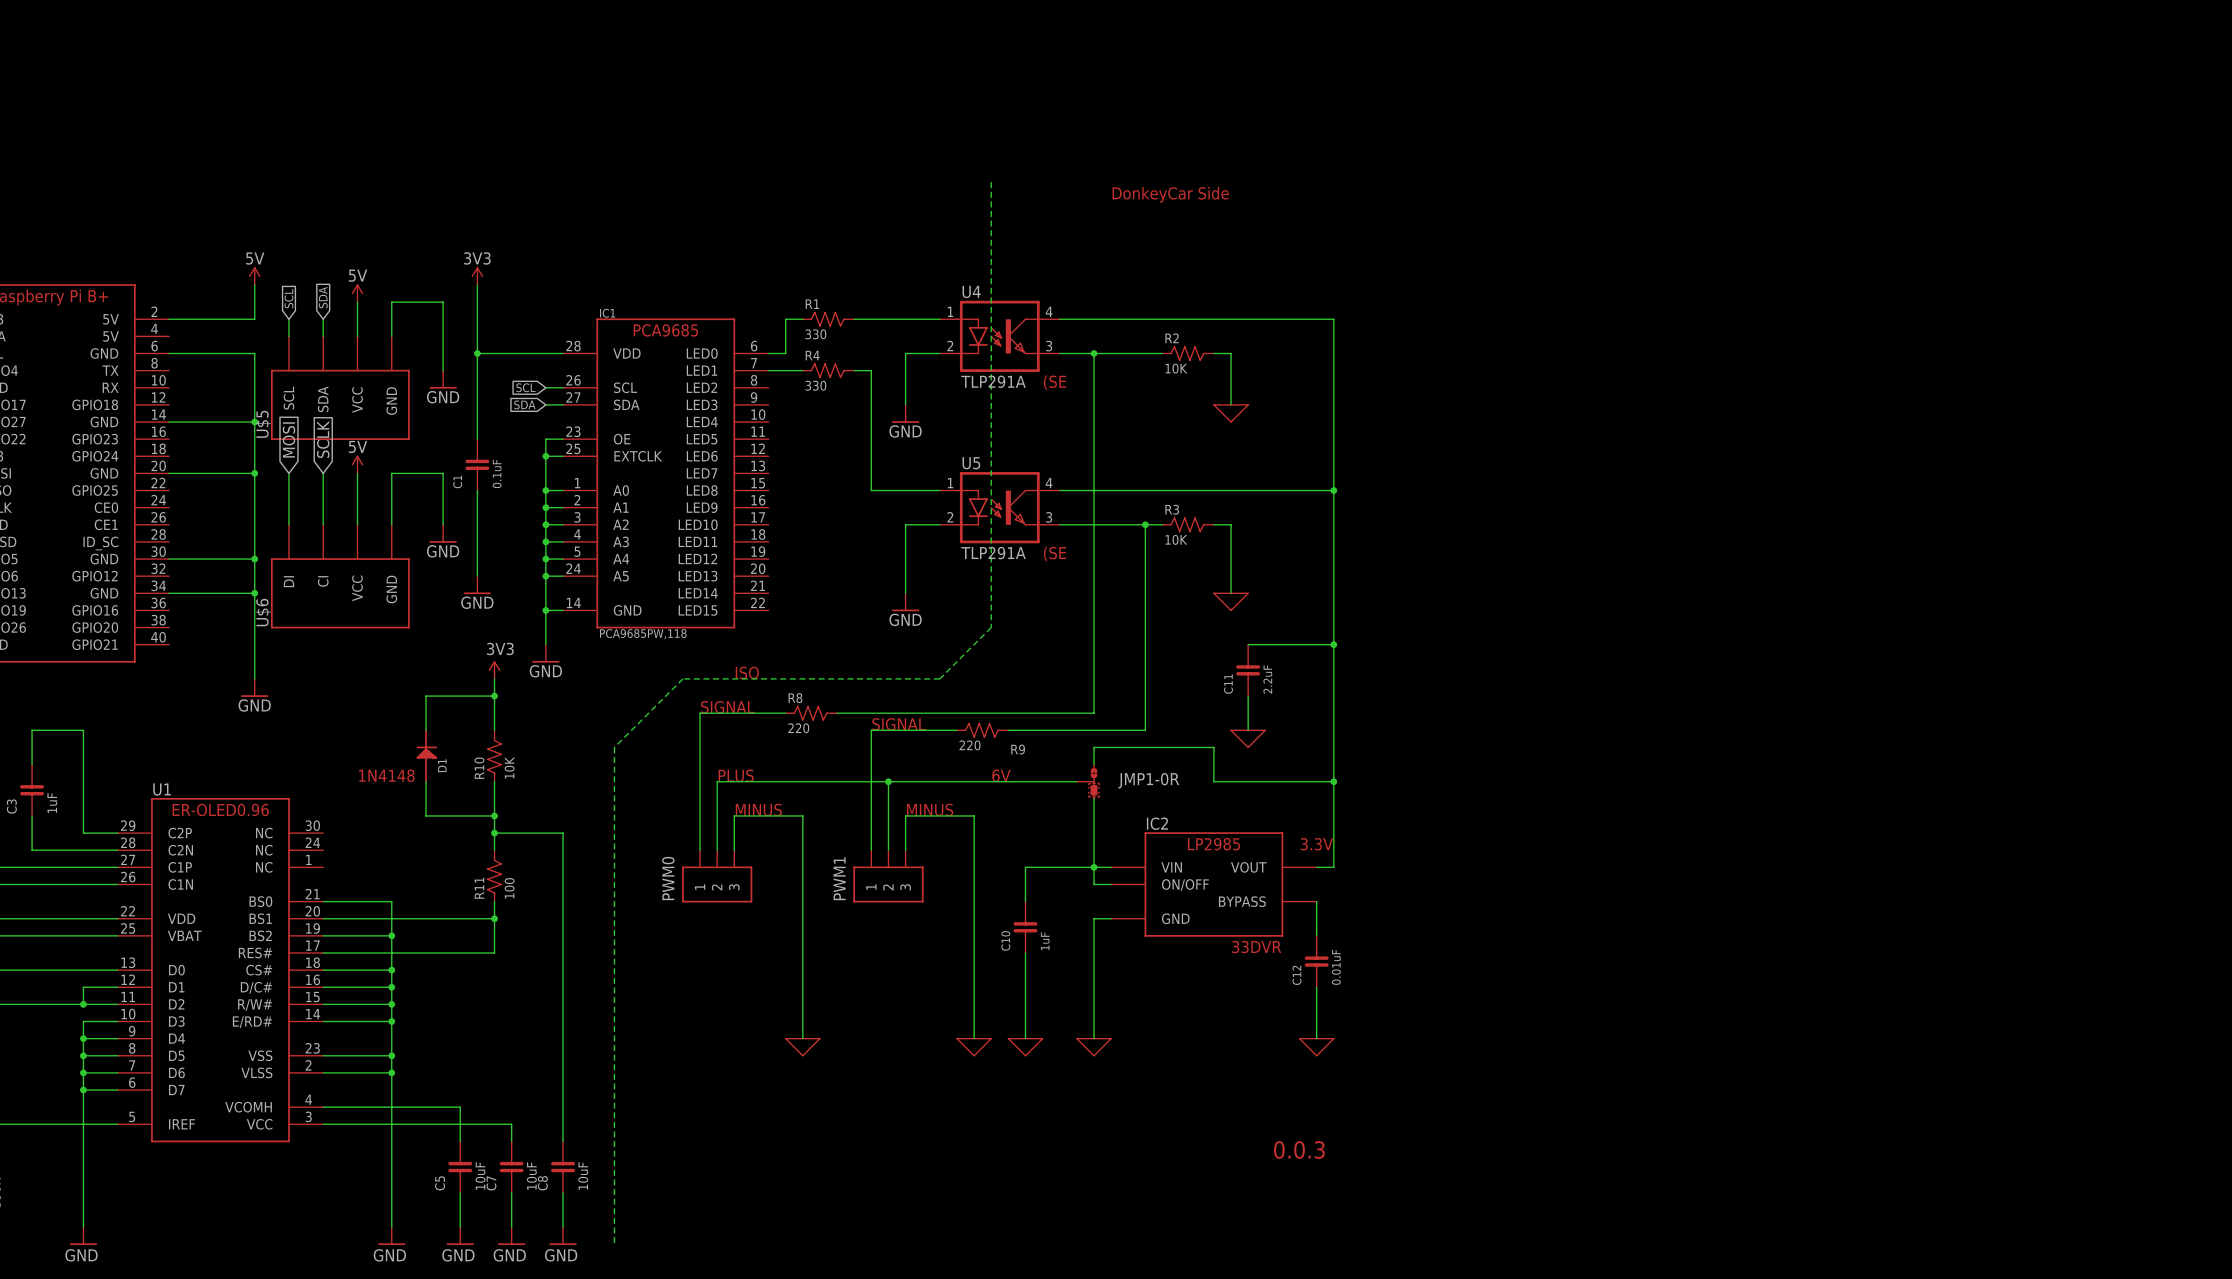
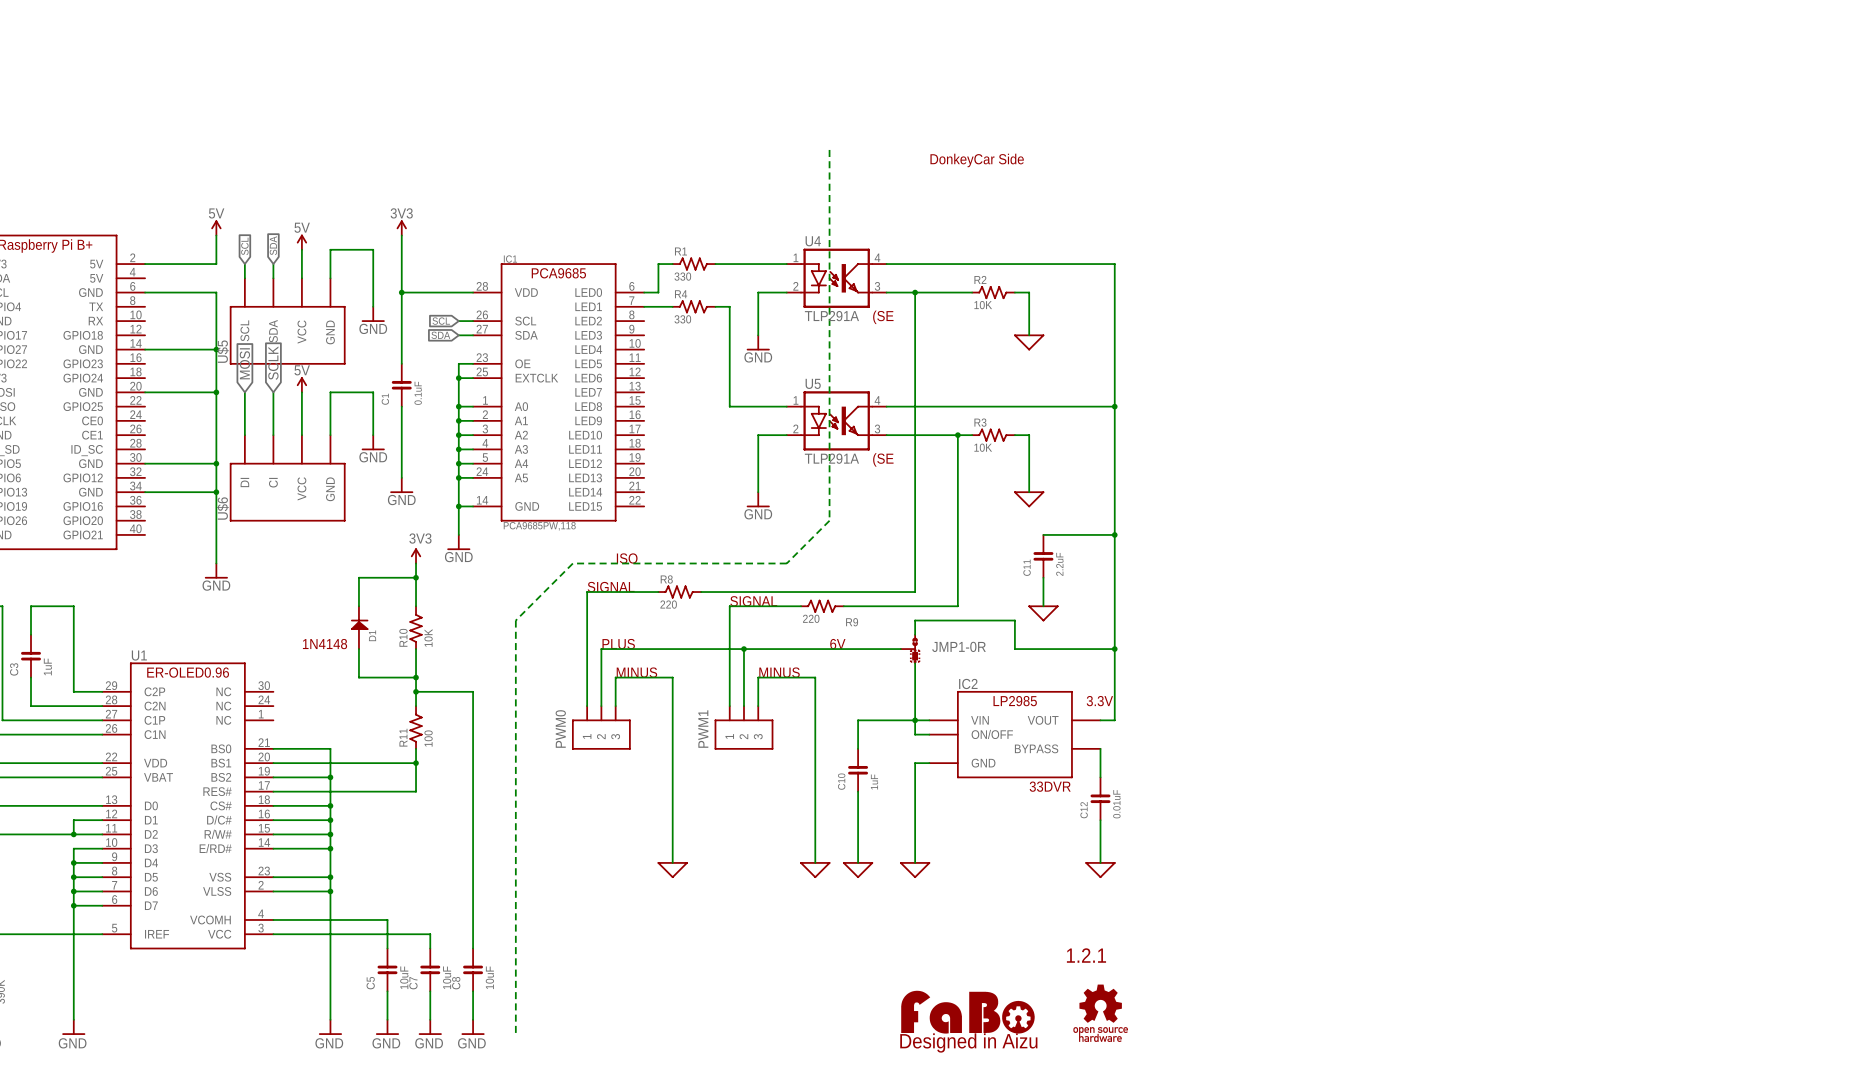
text: 0.0.3 (1299, 1149) -> 1.2.1 (1086, 955)
part: none -> (967, 1012)
part: none -> (1100, 1013)

